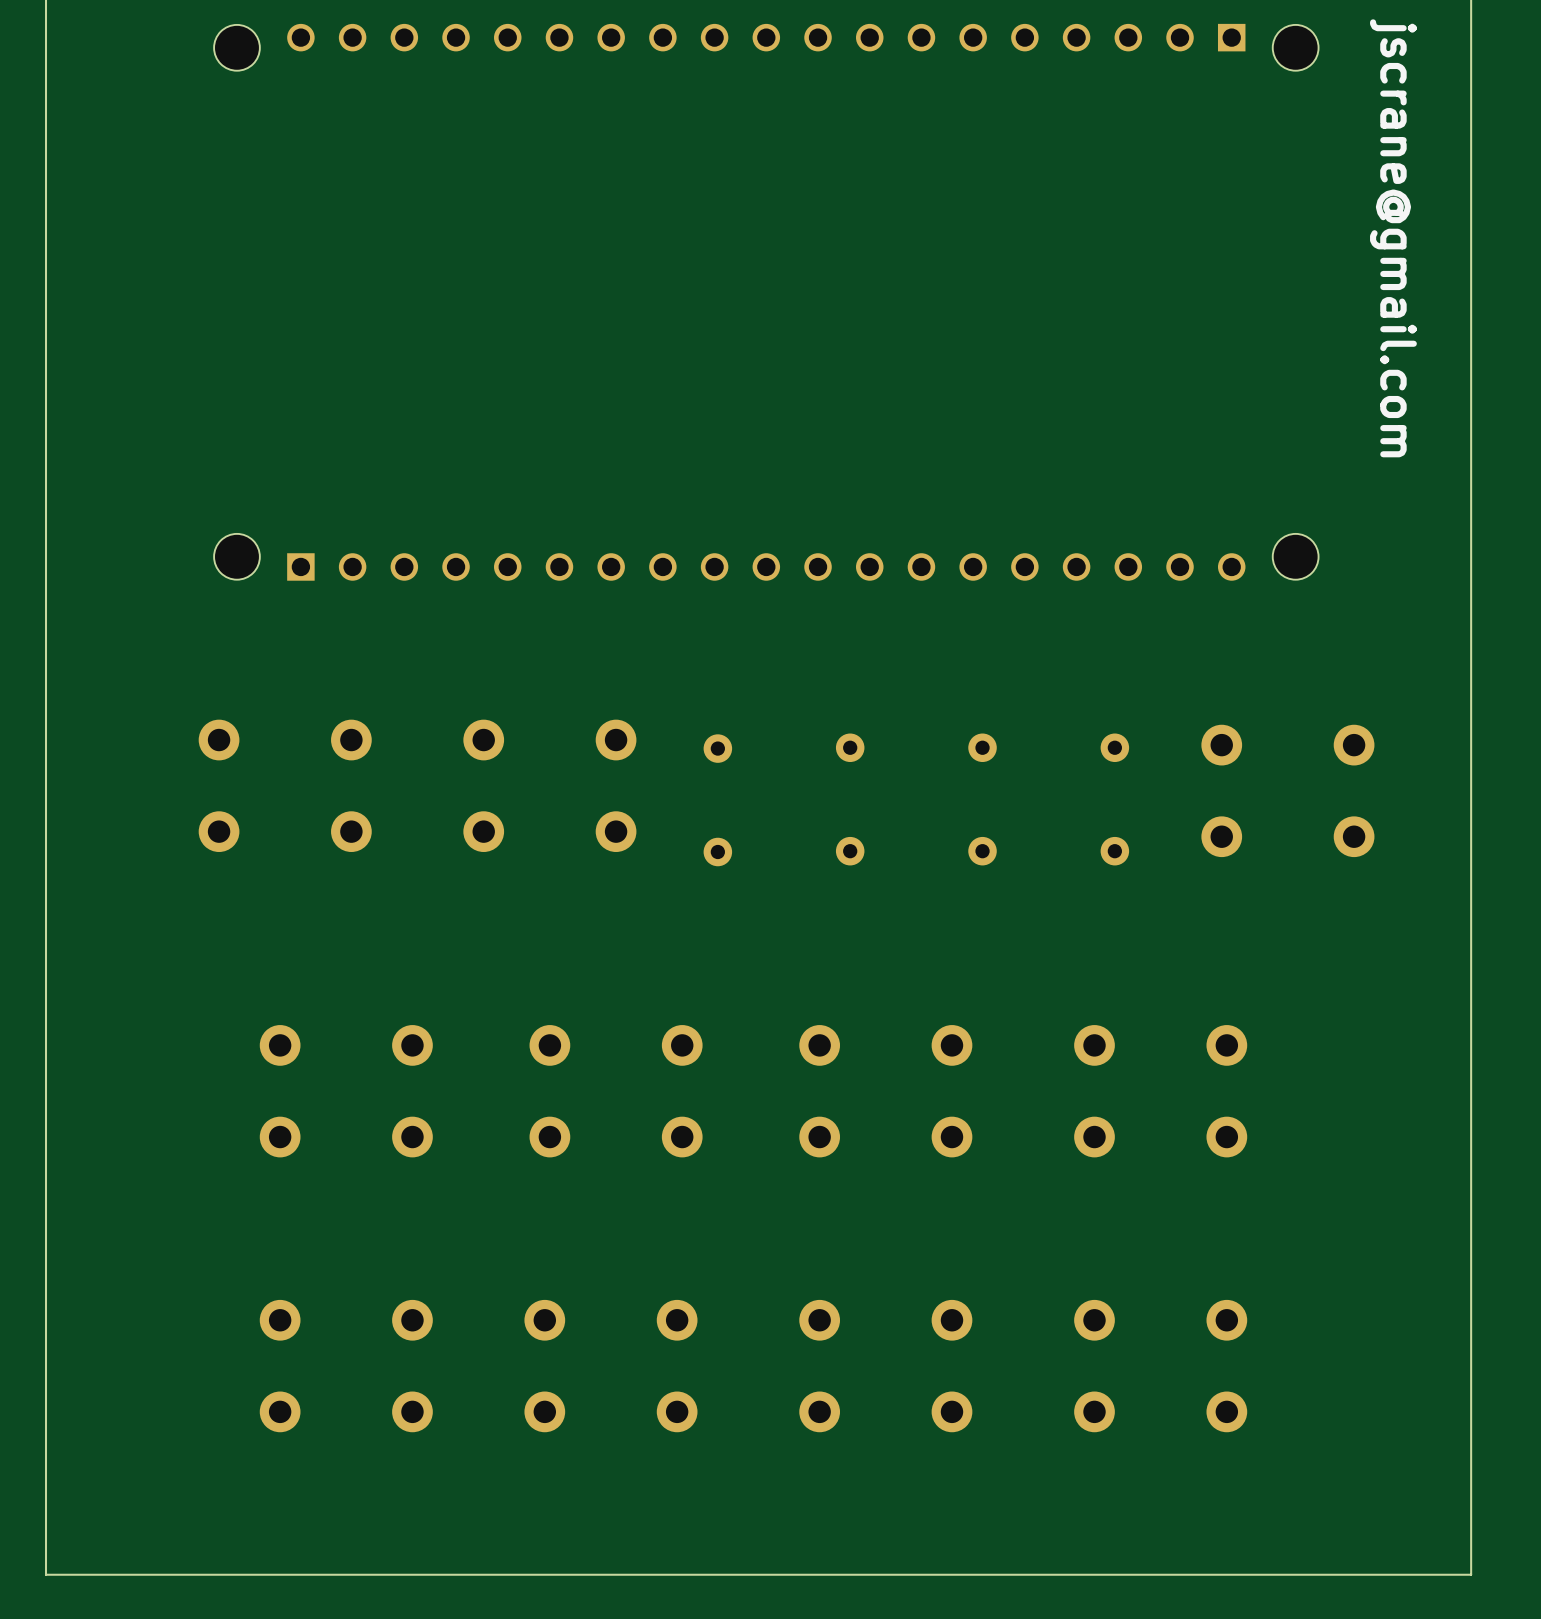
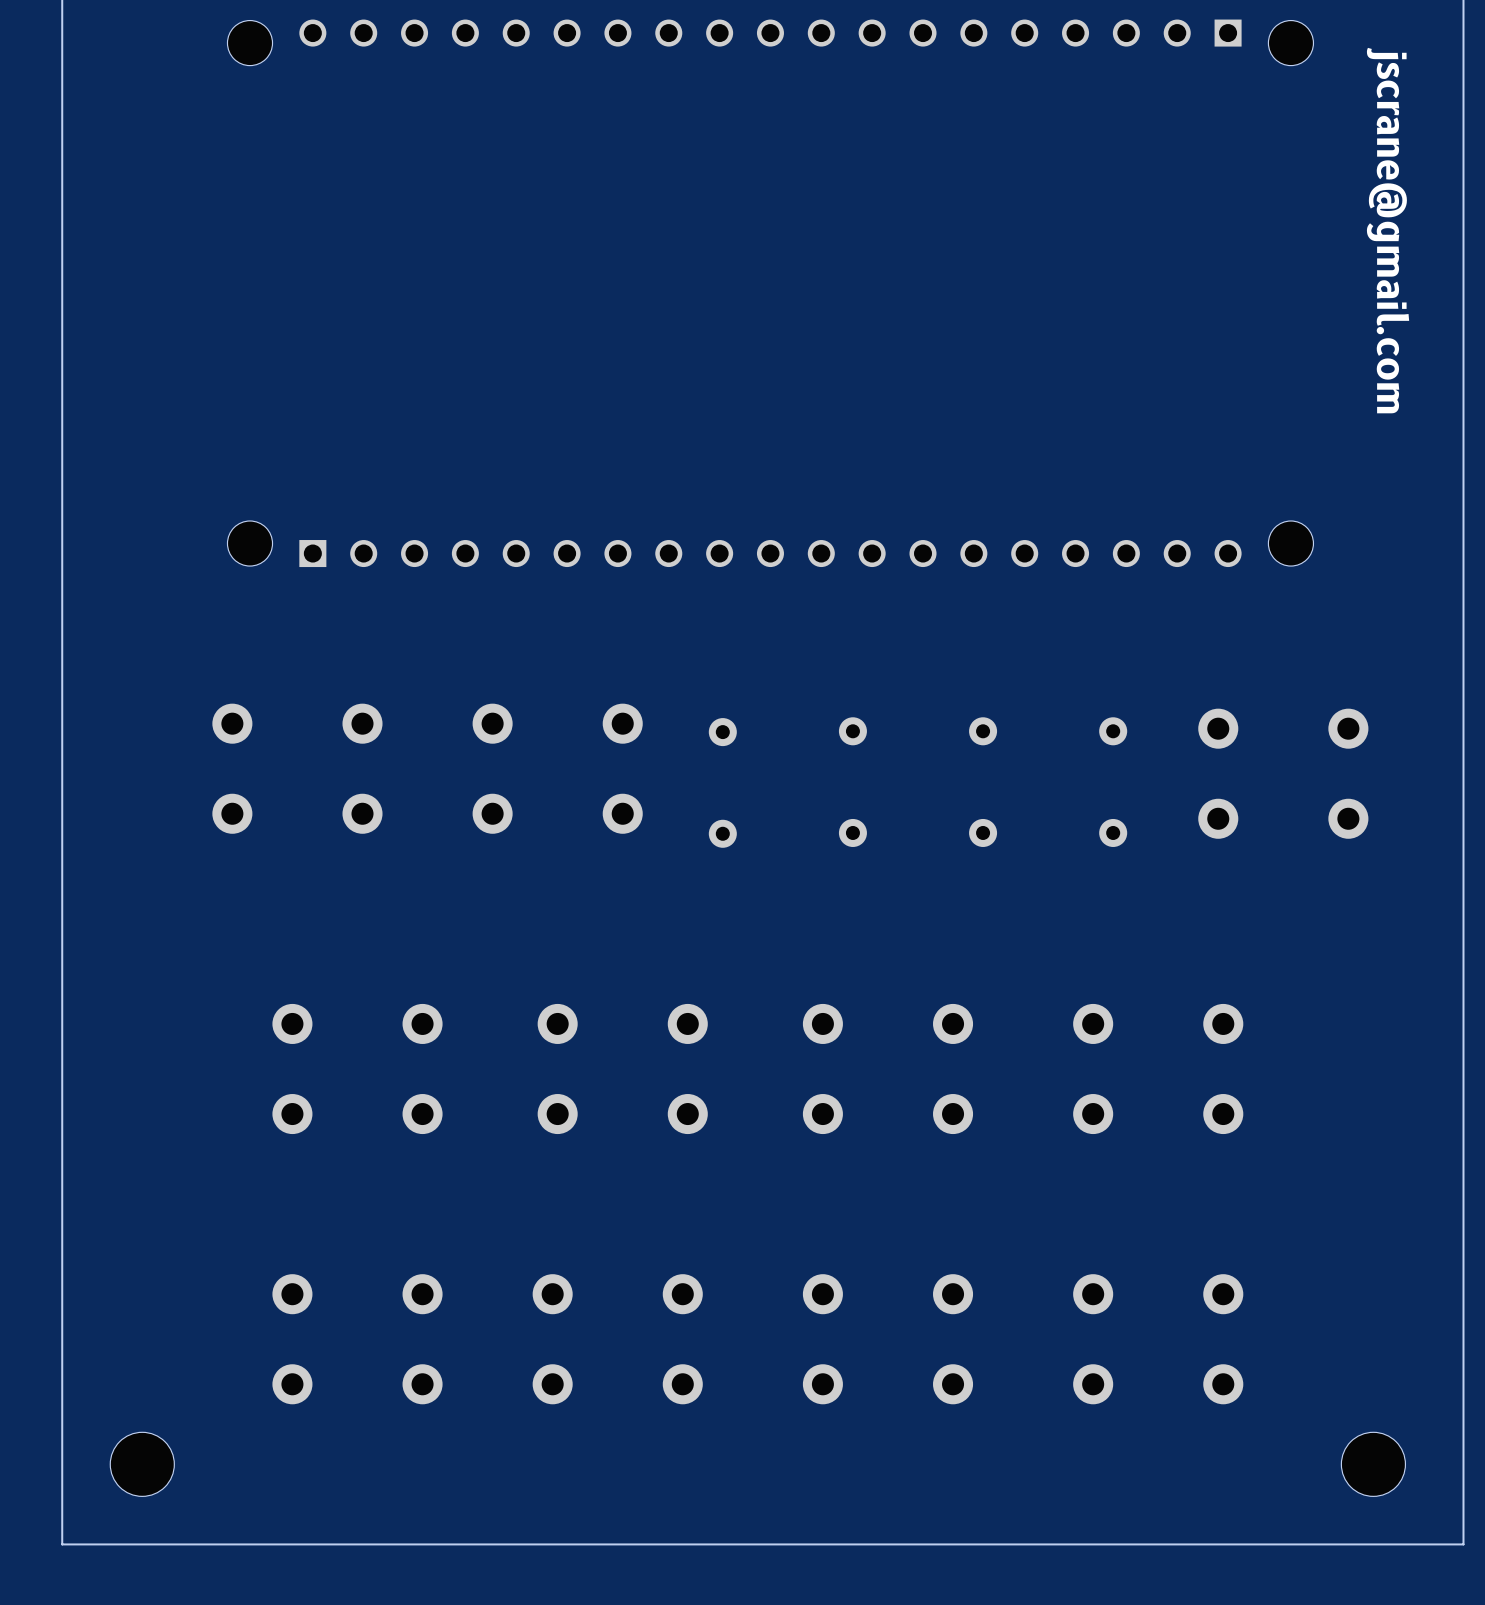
part: none -> (142, 1464)
part: none -> (1373, 1464)

